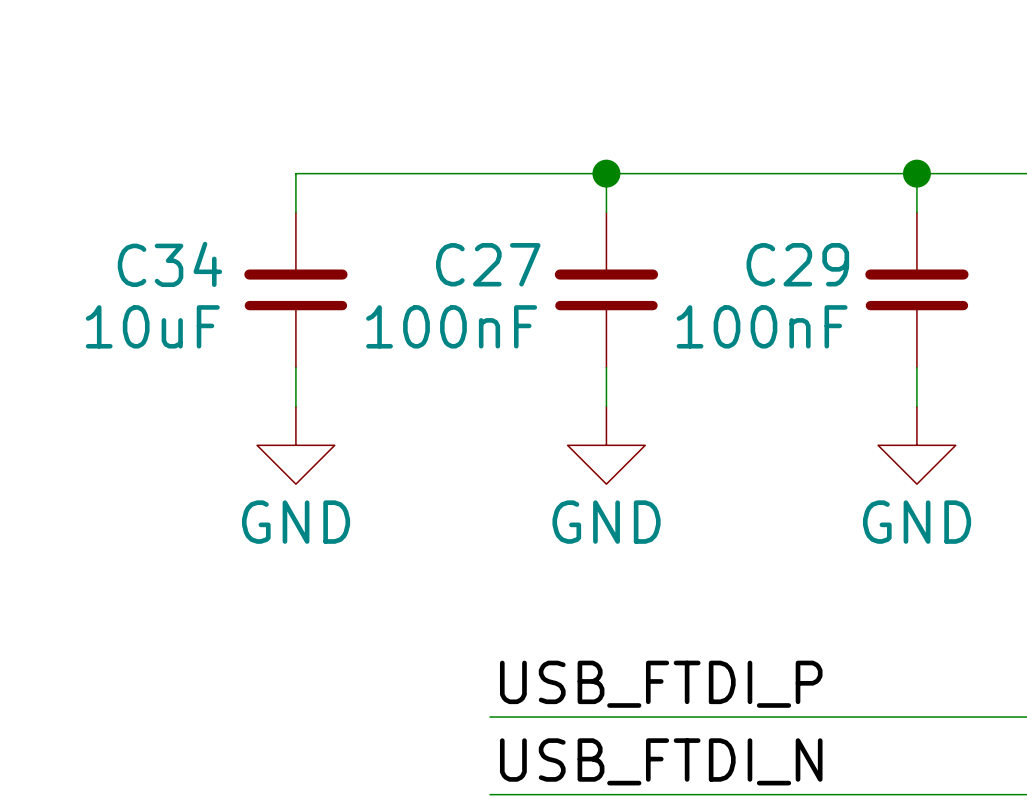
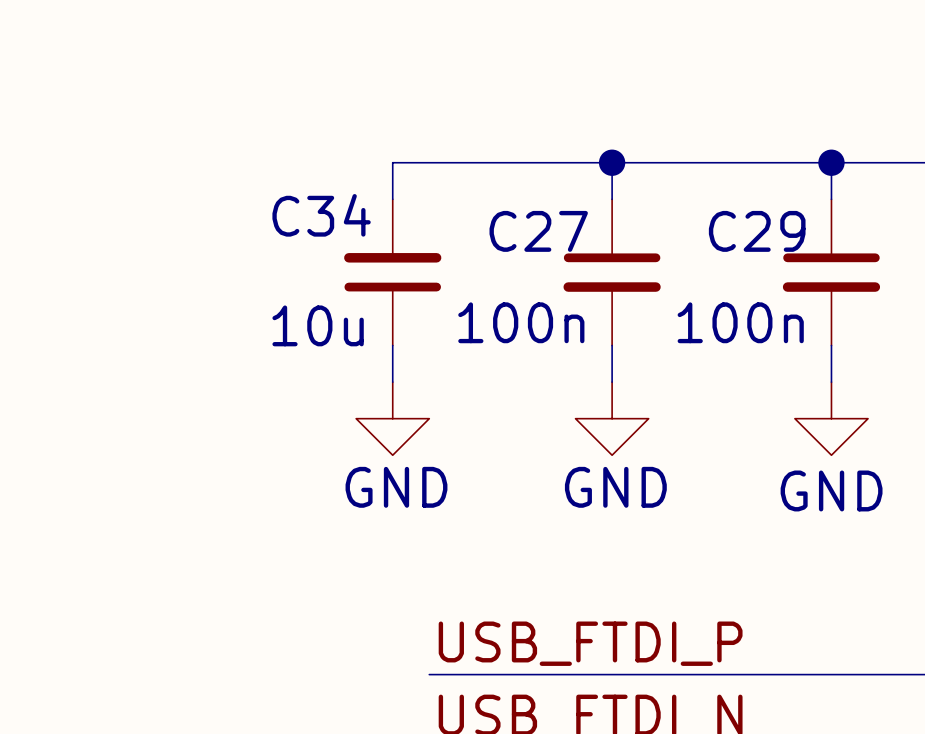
wire: (451, 173) (295, 173) (295, 212) -> (392, 162) (392, 199)
wire: (606, 173) (606, 212) -> (612, 162) (612, 199)
junction position: (606, 173) -> (612, 162)
C34 name position: C34 (169, 264) -> C34 (321, 215)
C27 rotation: 0° (606, 289) -> 180° (612, 272)
C29 rotation: 0° (916, 289) -> 180° (831, 272)
C34 position: (295, 290) -> (392, 272)
C34 value: 10uF (152, 326) -> none
C27 value: 100nF (451, 326) -> none
C29 value: 100nF (762, 326) -> none
C27 text: none -> 100n (521, 322)
C29 text: none -> 100n (740, 322)
C34 text: none -> 10u (318, 325)
wire: (295, 367) (295, 406) -> (392, 345) (392, 382)
wire: (606, 367) (606, 406) -> (612, 345) (612, 382)
power symbol: GND (295, 445) -> none
power symbol: none -> GND (392, 418)
power symbol: GND (606, 445) -> none
power symbol: none -> GND (612, 418)

